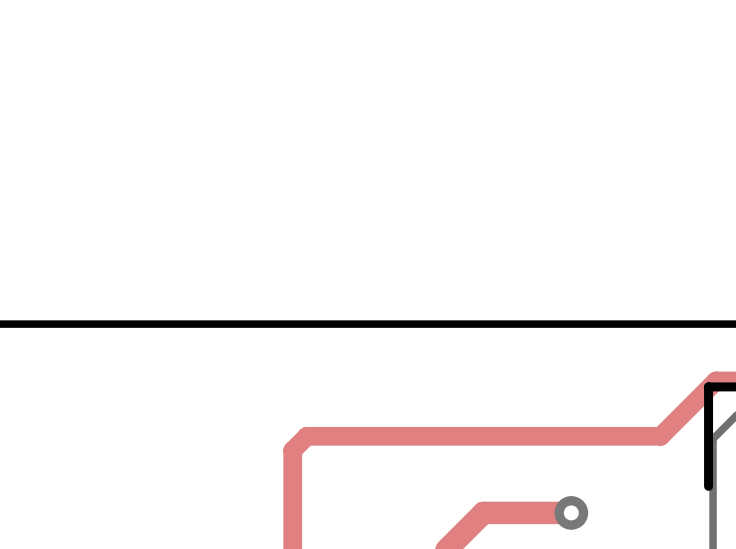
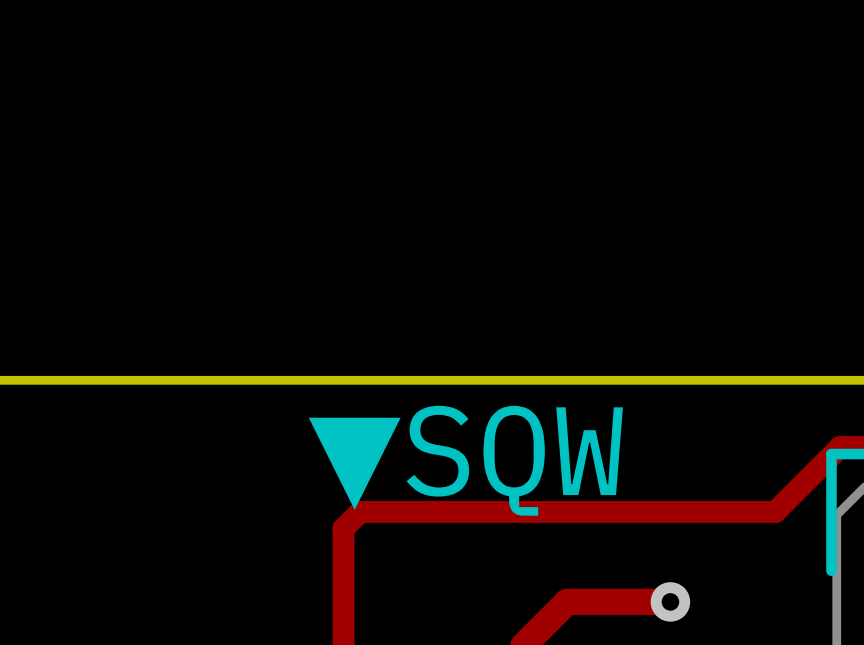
text: none -> ▼SQW (465, 460)

